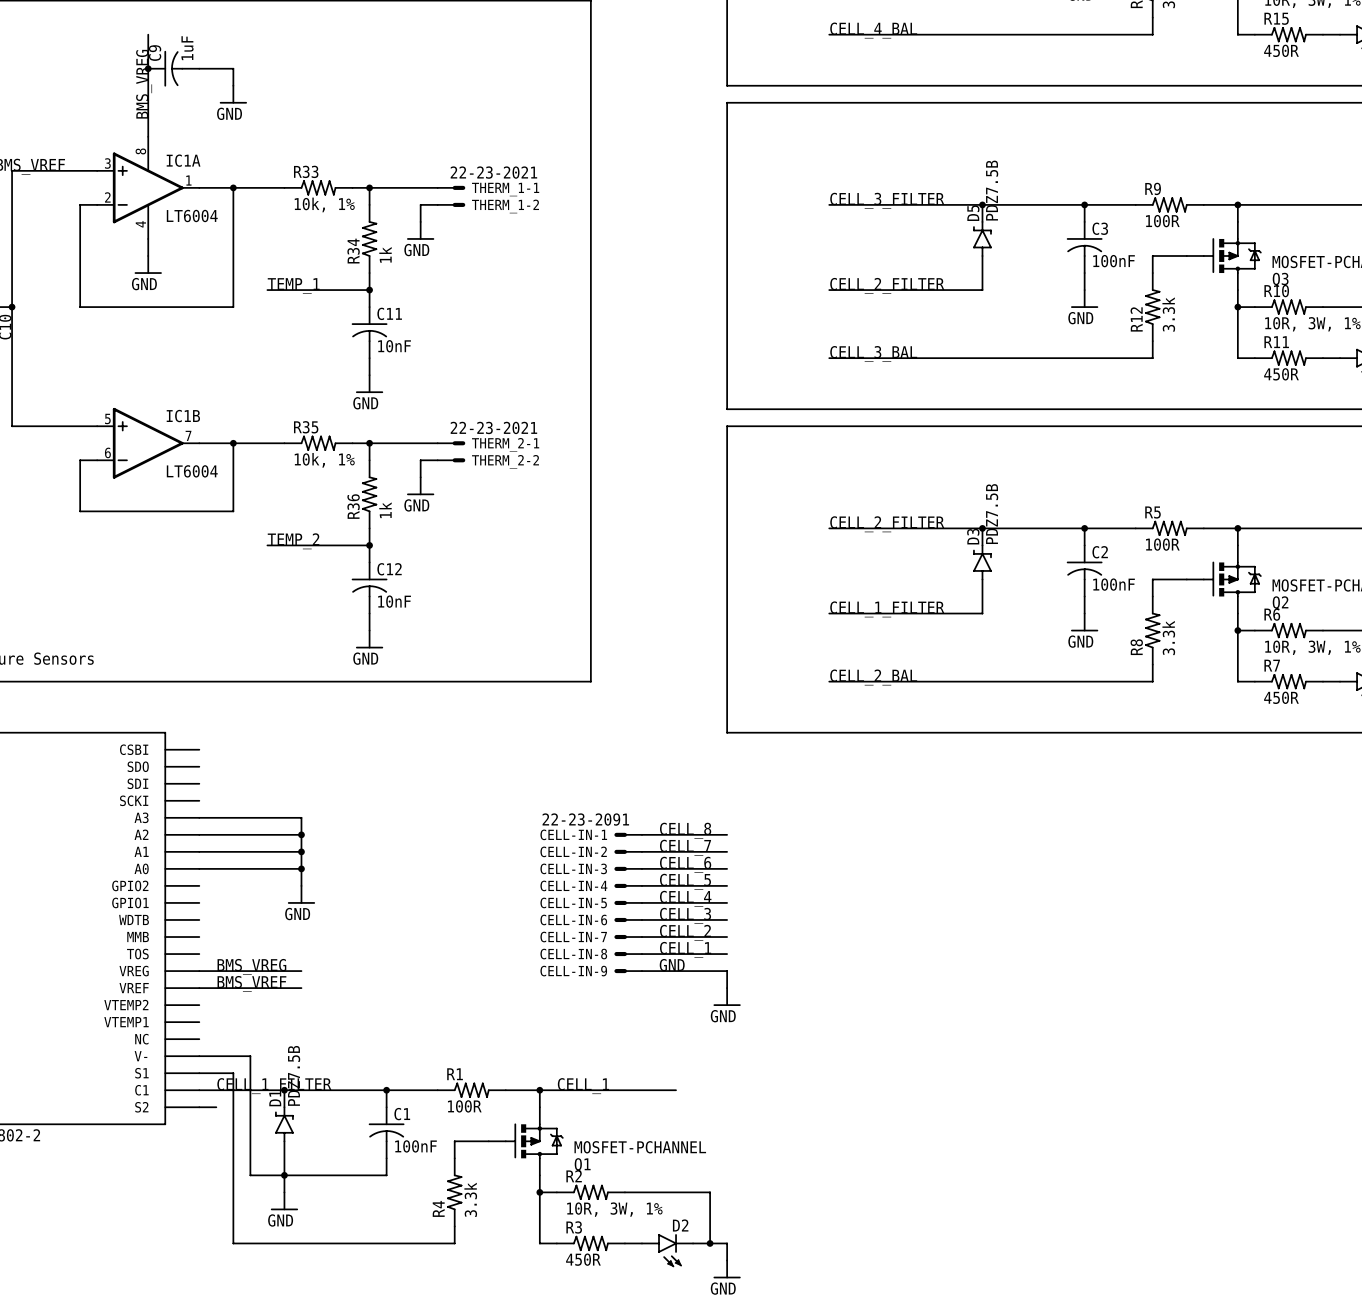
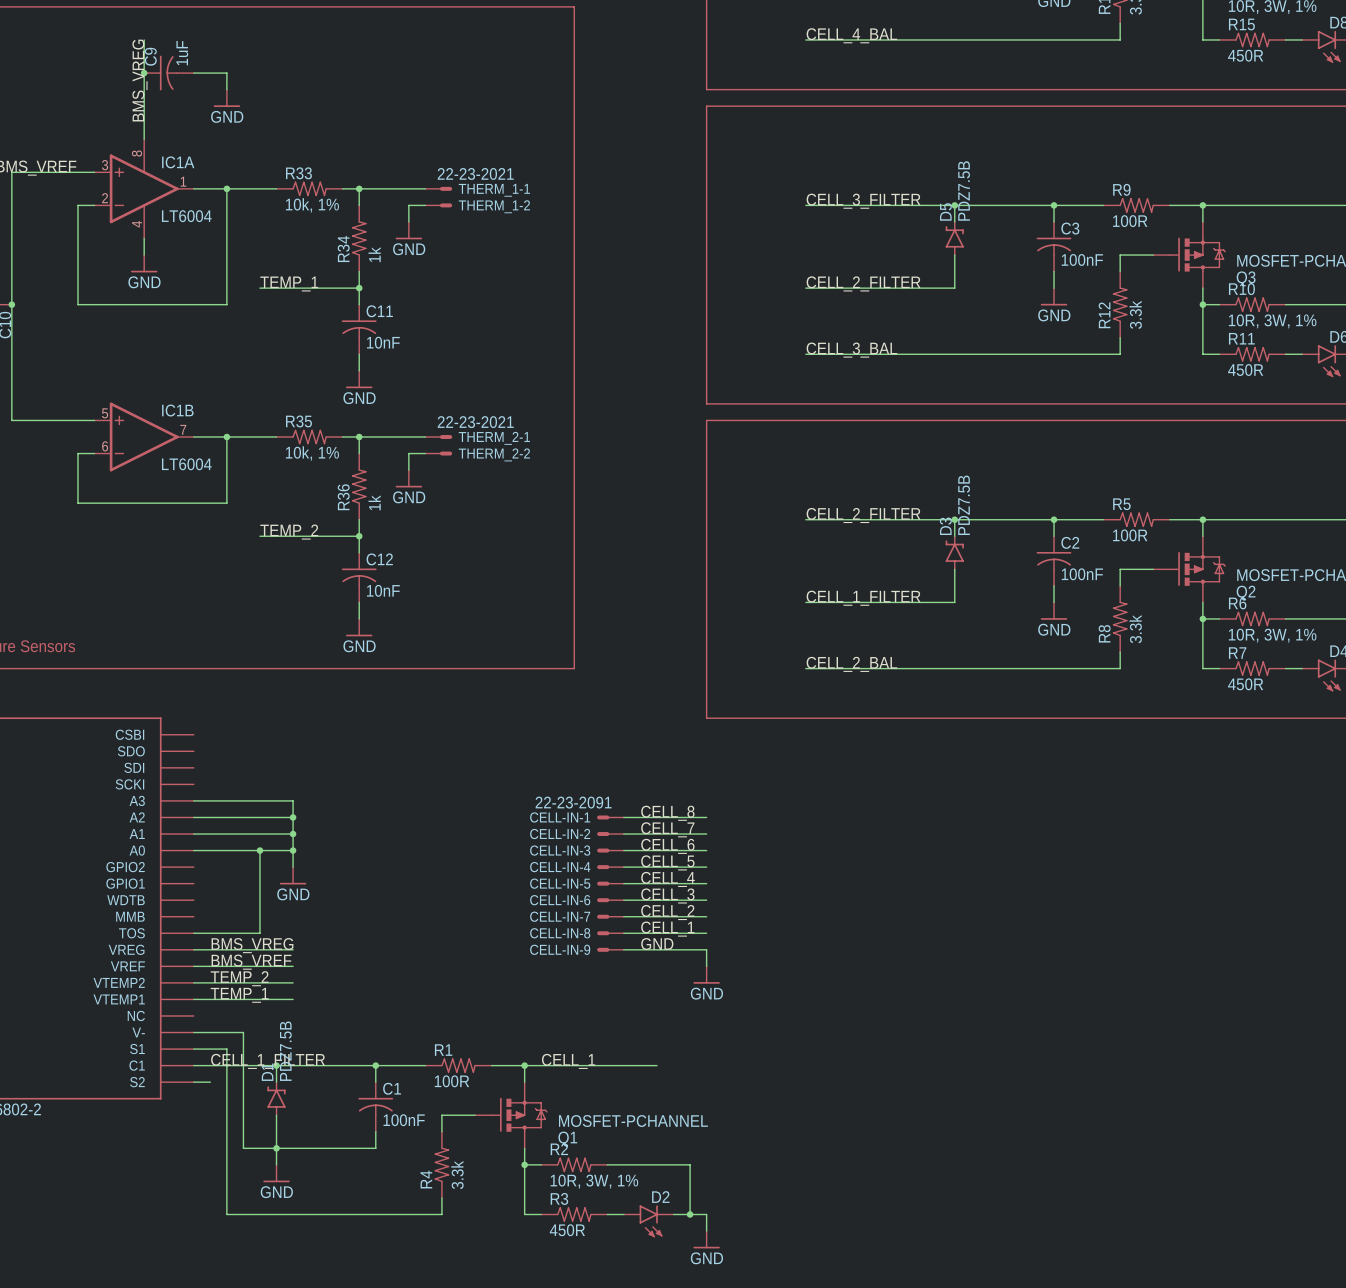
wire: none -> (259, 850) (259, 933) (193, 933)
junction: none -> (259, 850)
label: none -> TEMP_2 (239, 978)
wire: none -> (193, 982) (293, 982)
label: none -> TEMP_1 (239, 995)
wire: none -> (193, 999) (293, 999)

